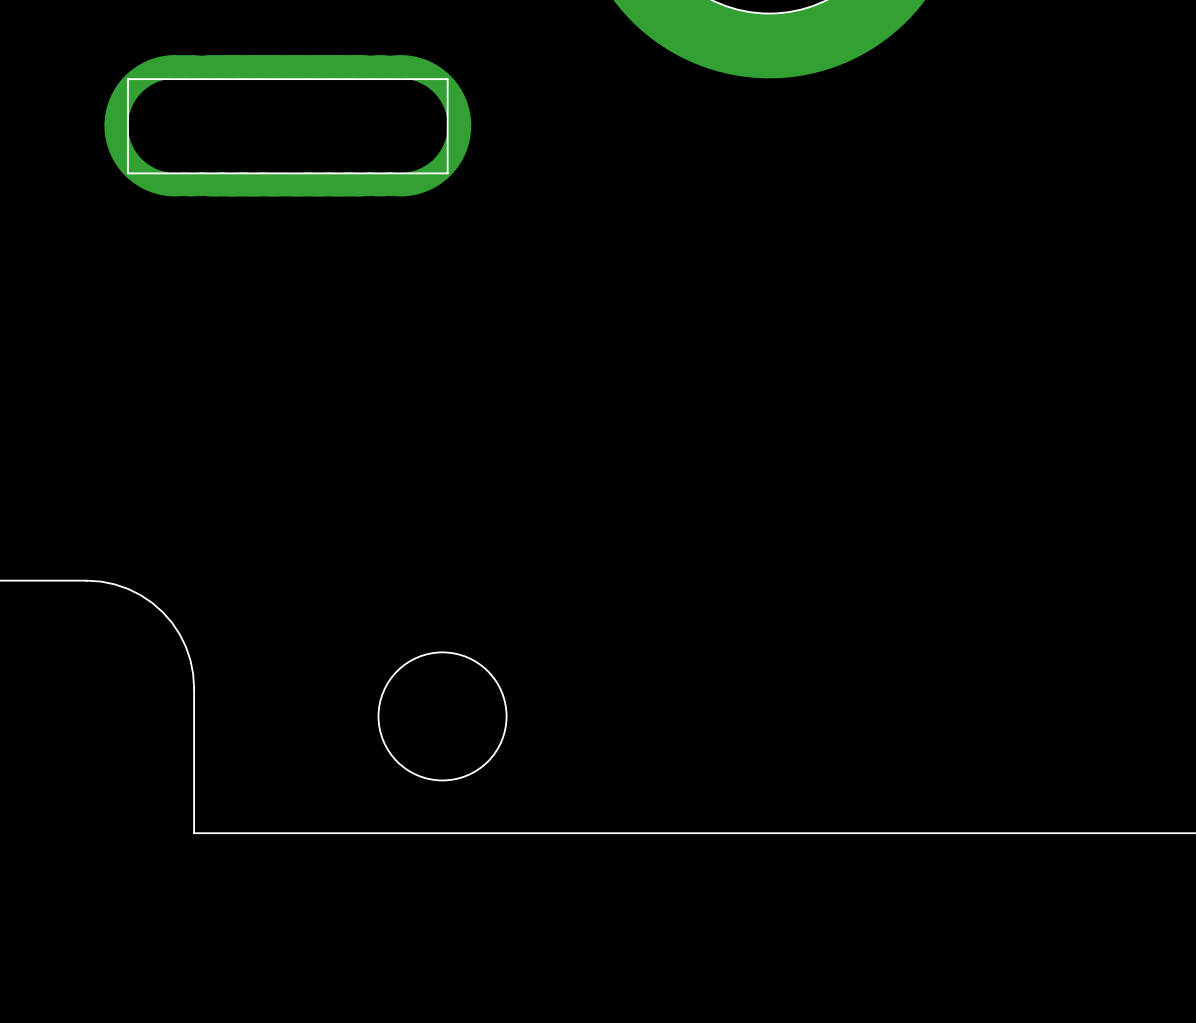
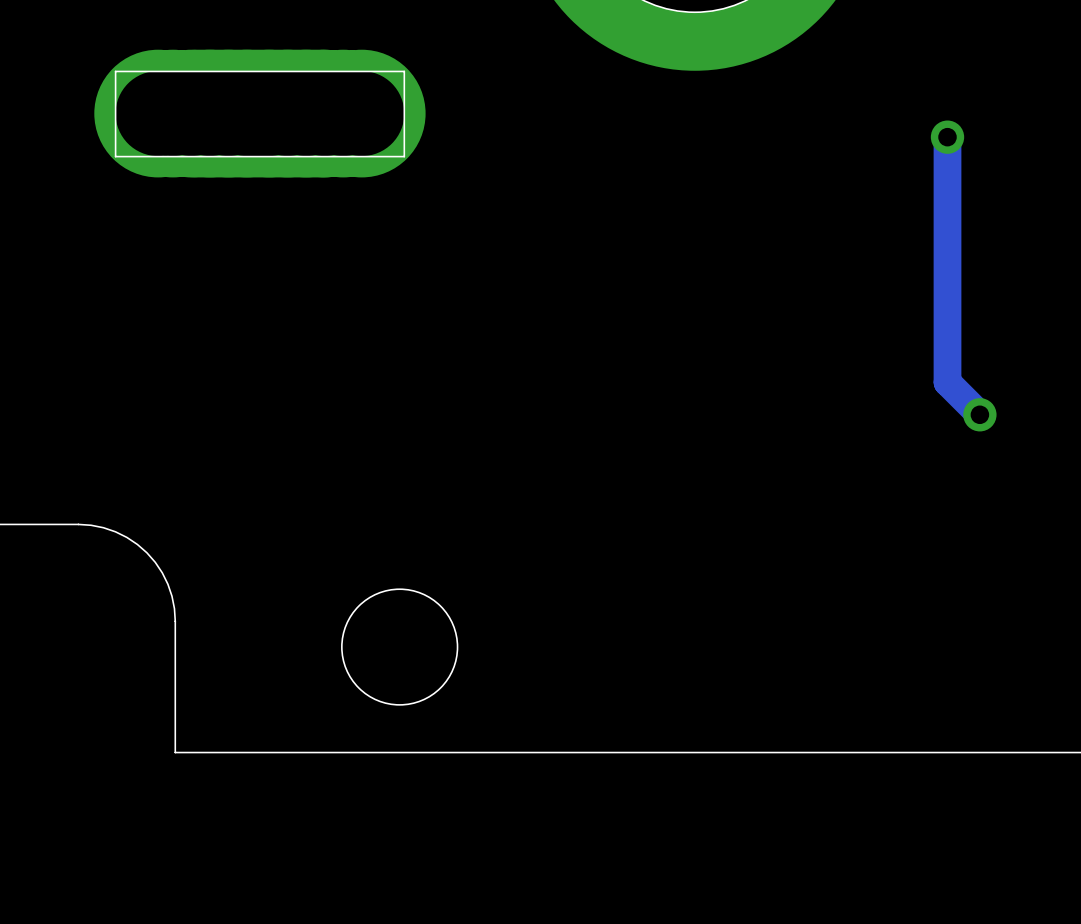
track: none -> (947, 137) (947, 382) (979, 414)
via: none -> (947, 137)
via: none -> (979, 414)

